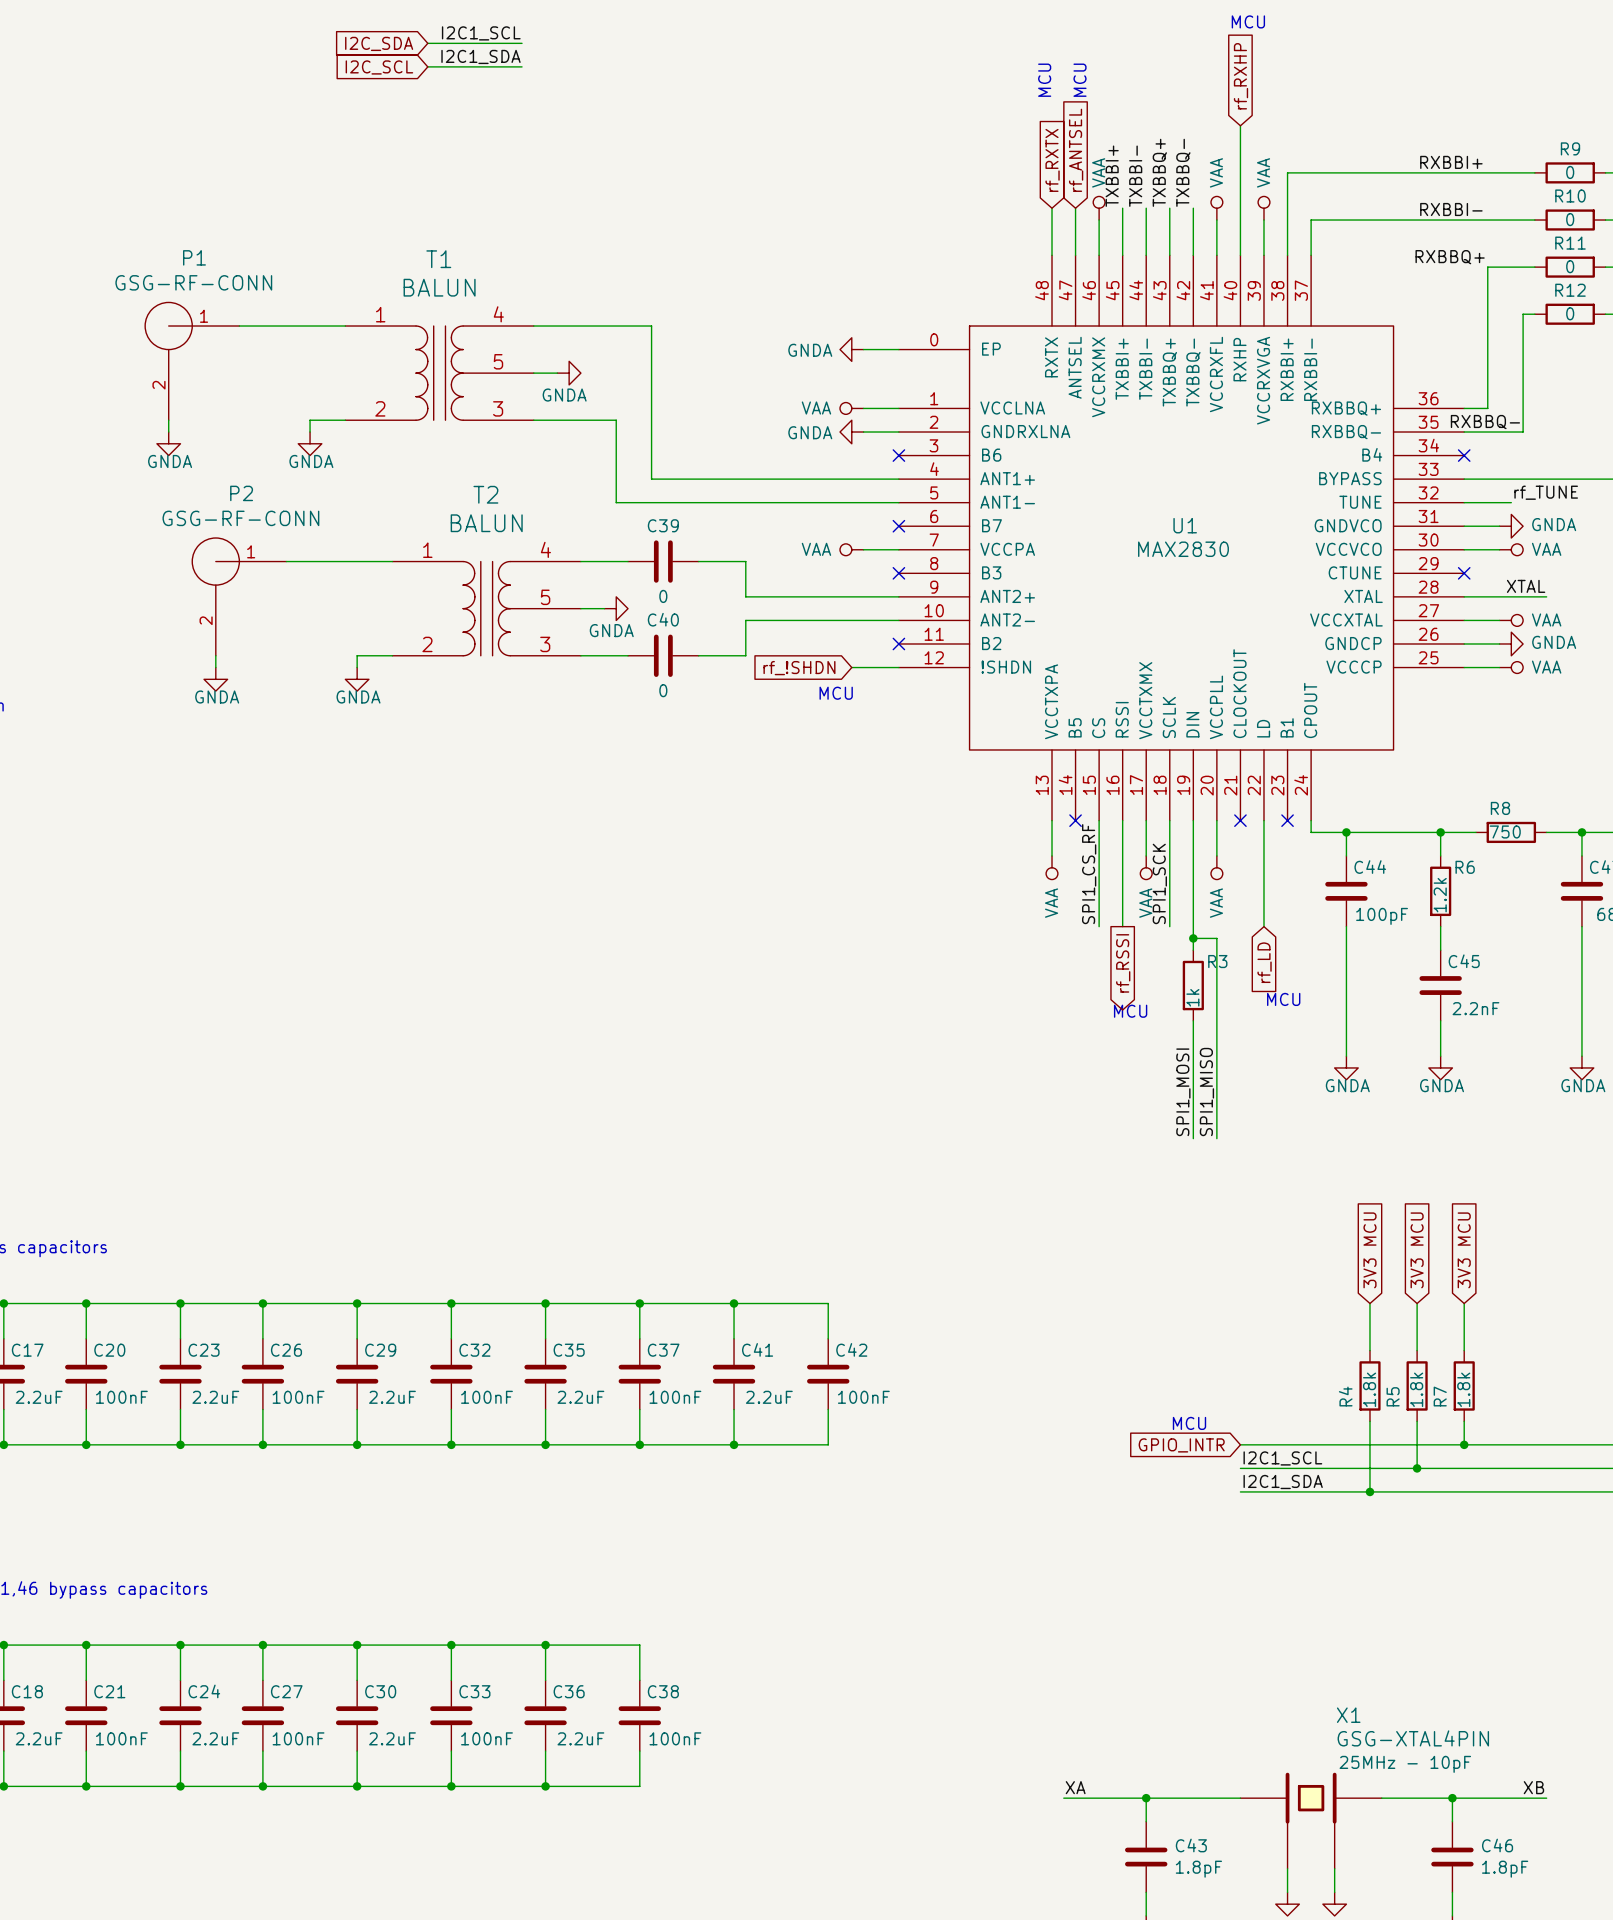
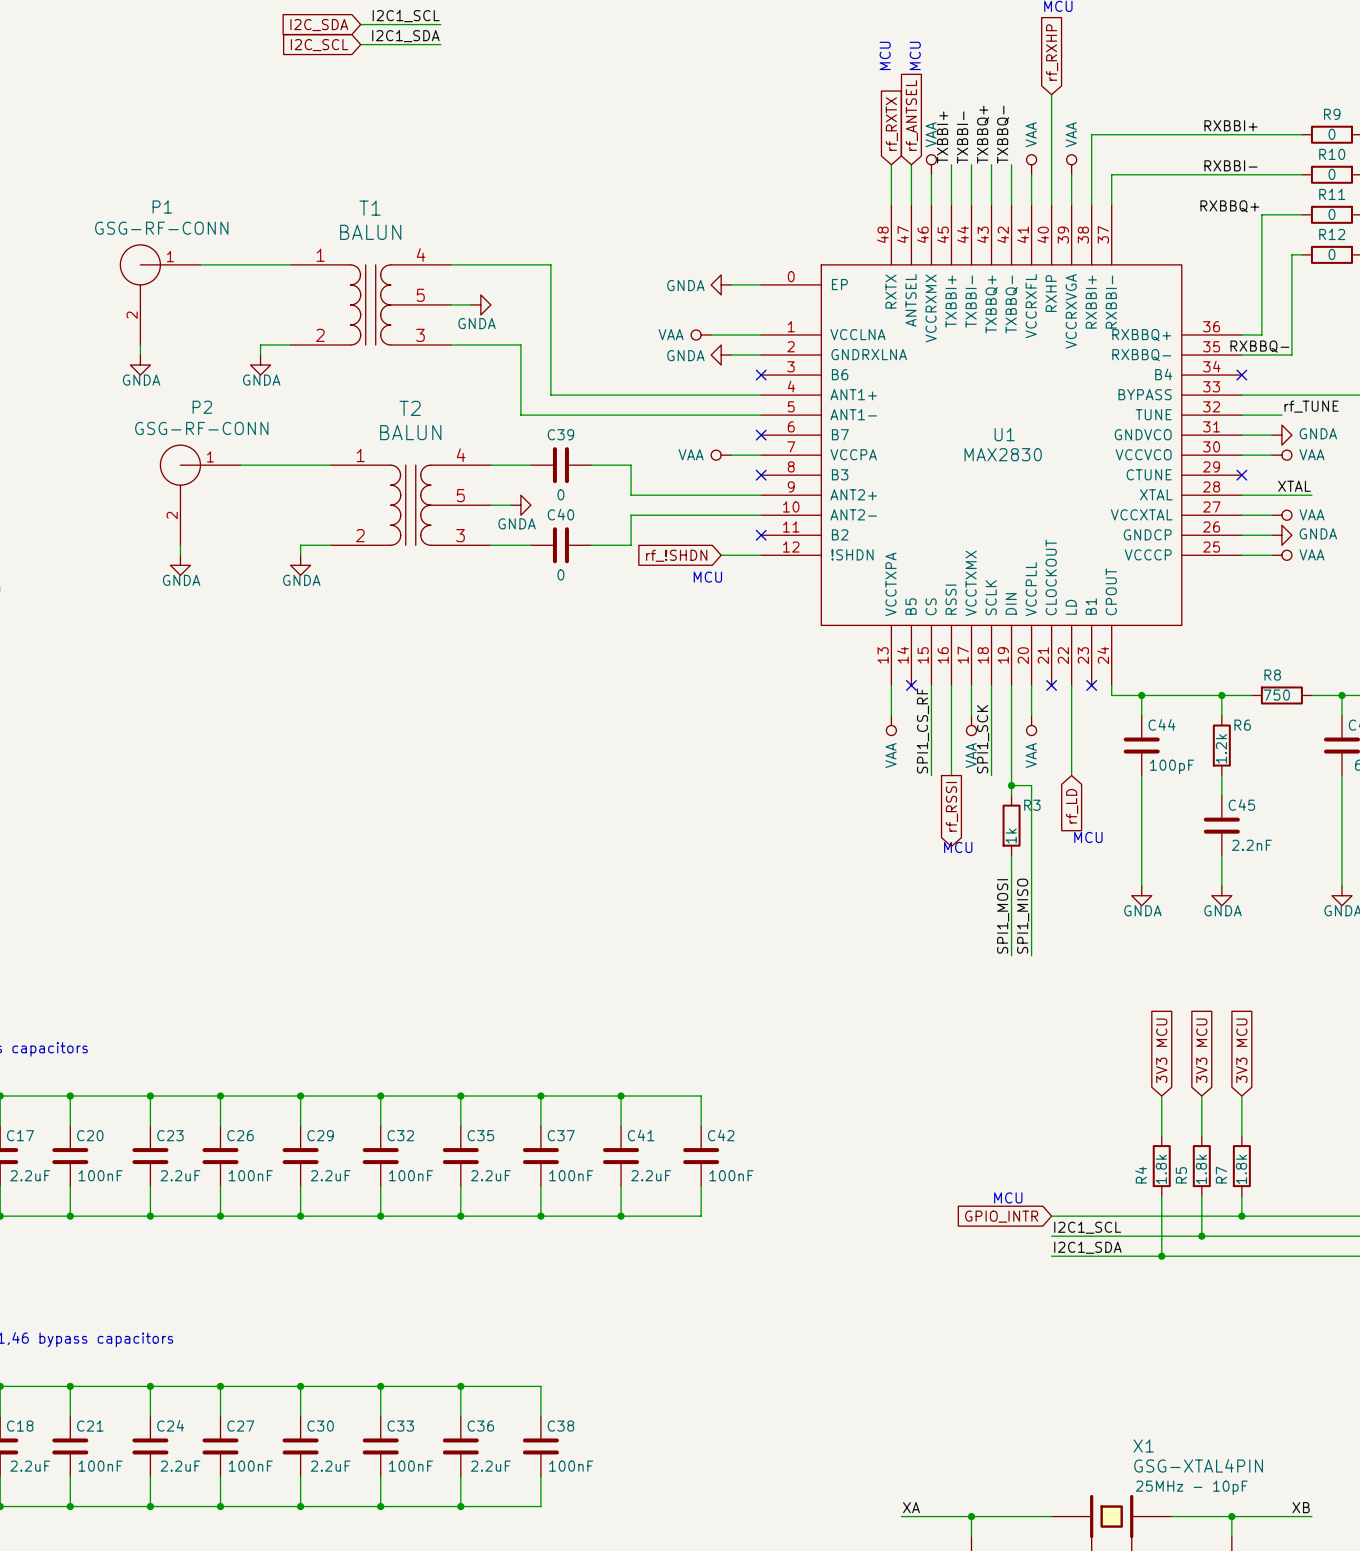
power symbol position: VAA (851, 408) -> VAA (701, 334)

